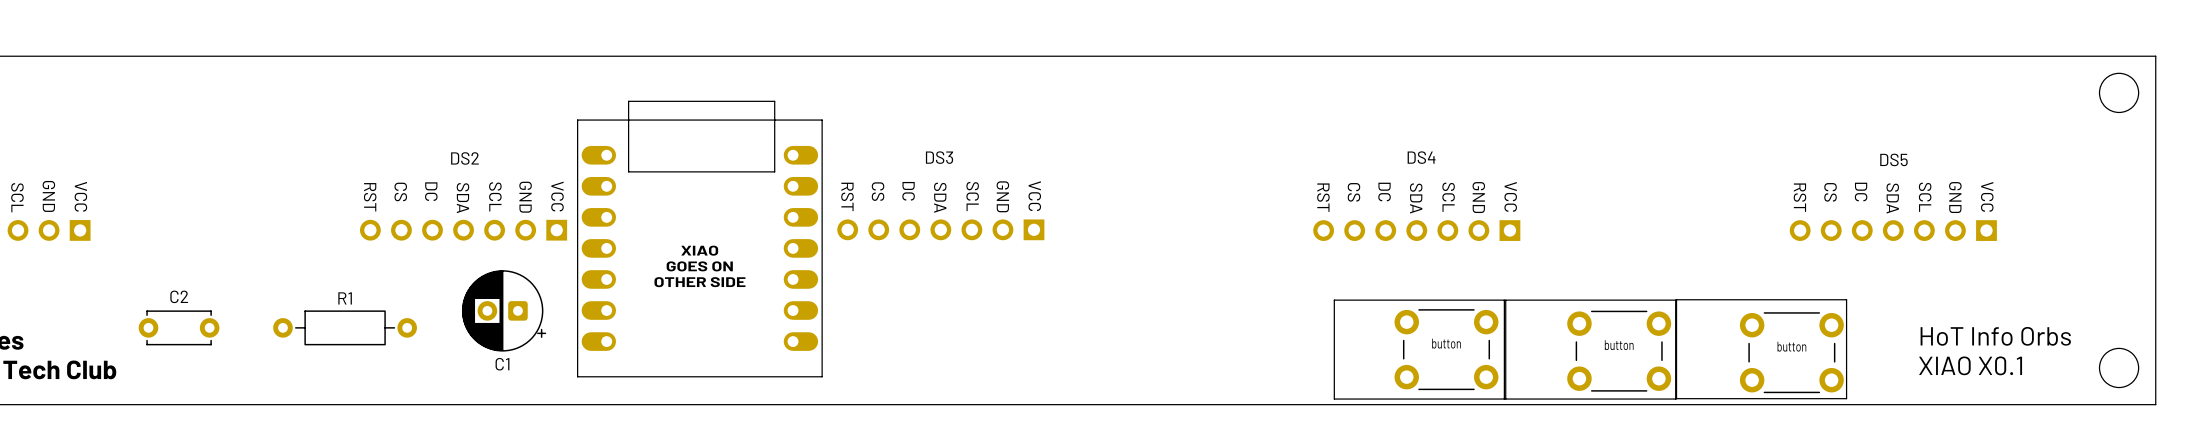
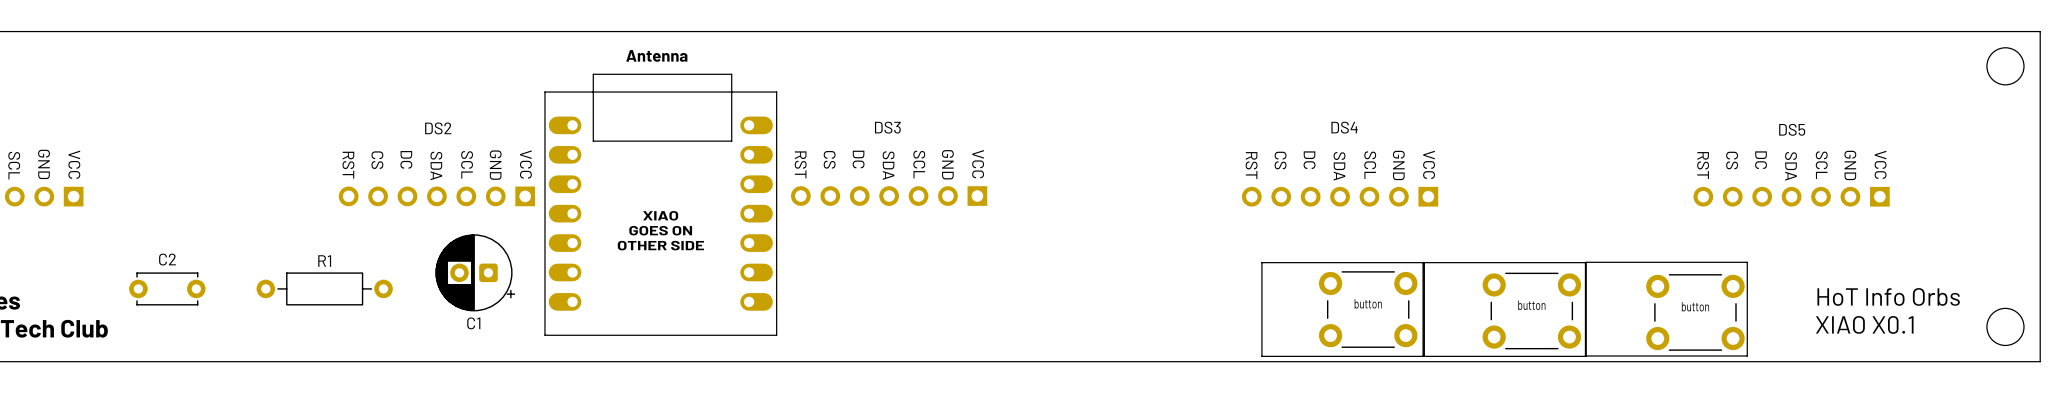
text: none -> Antenna (656, 55)

